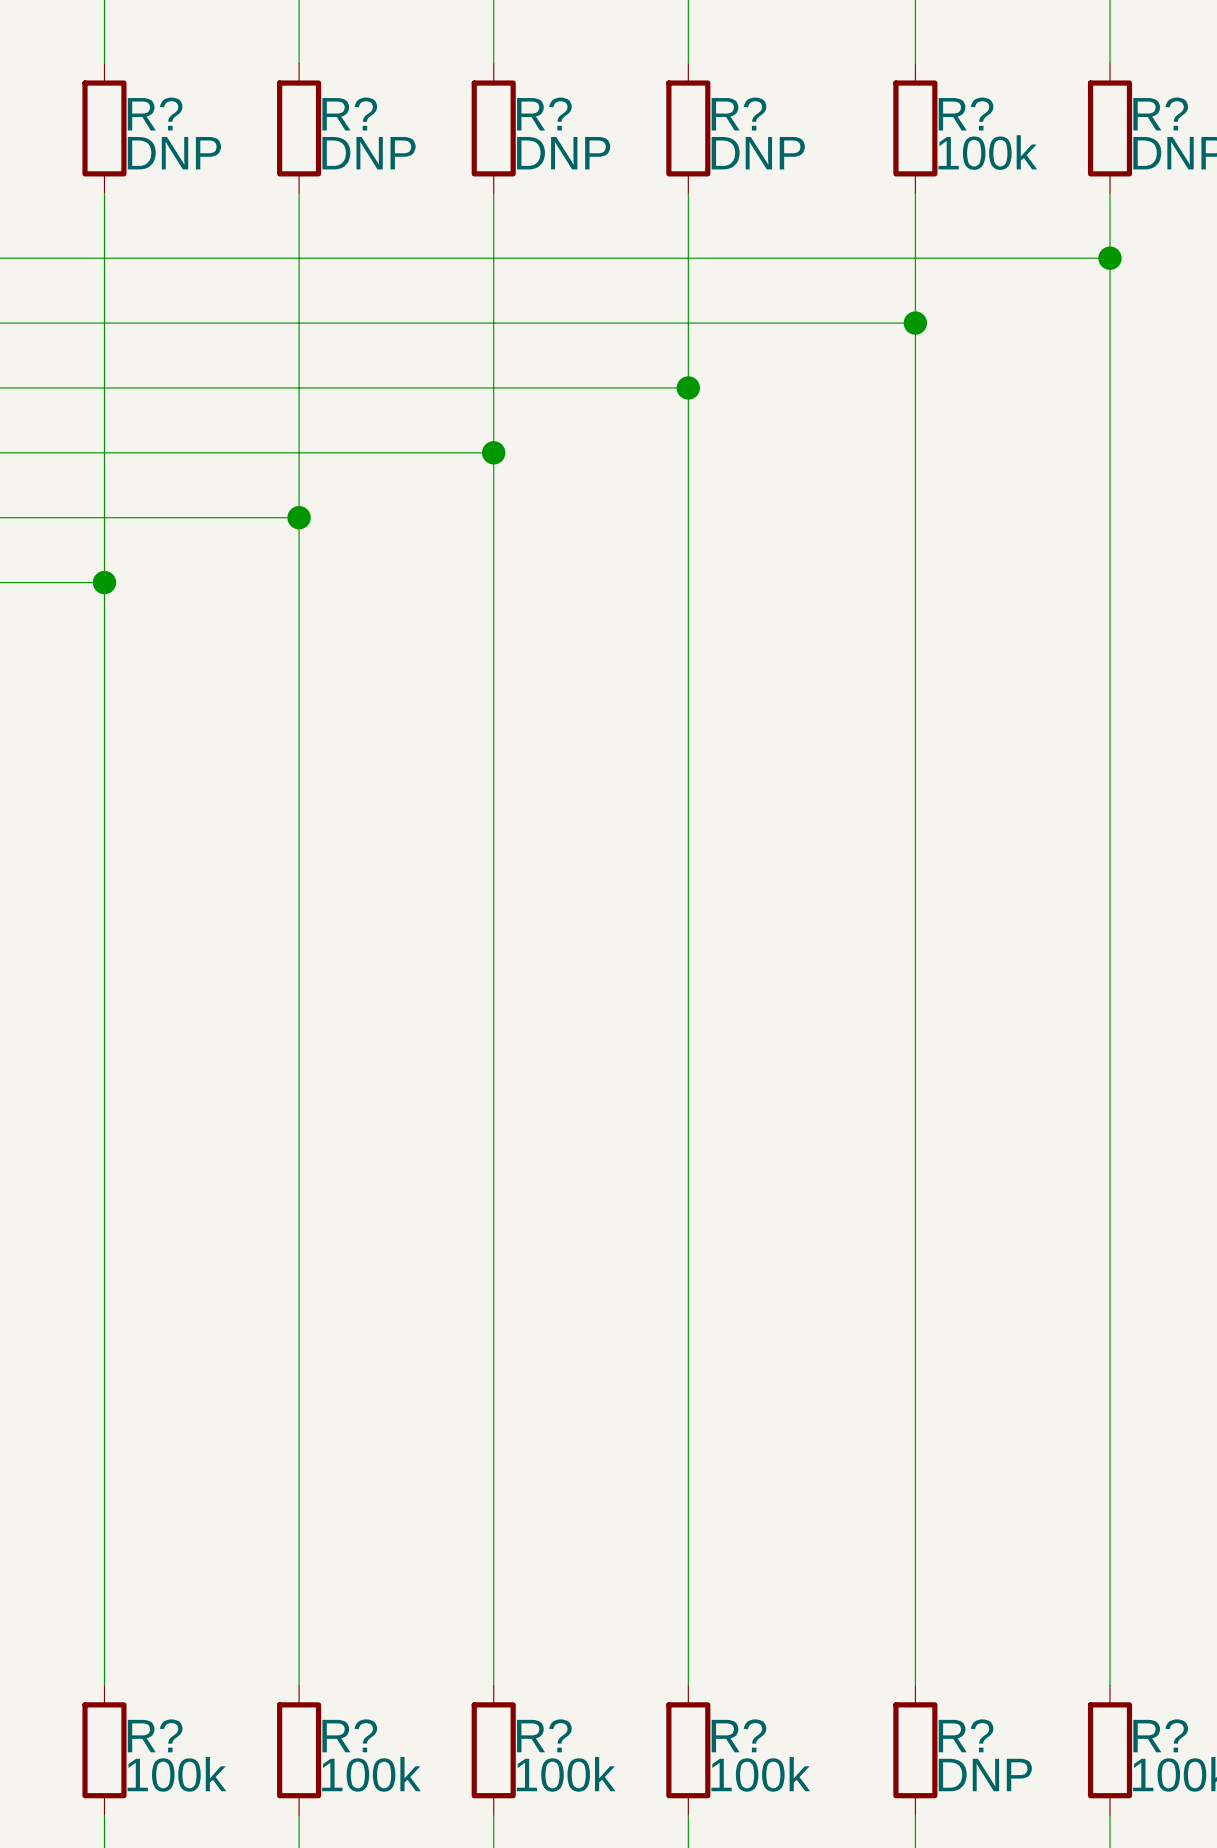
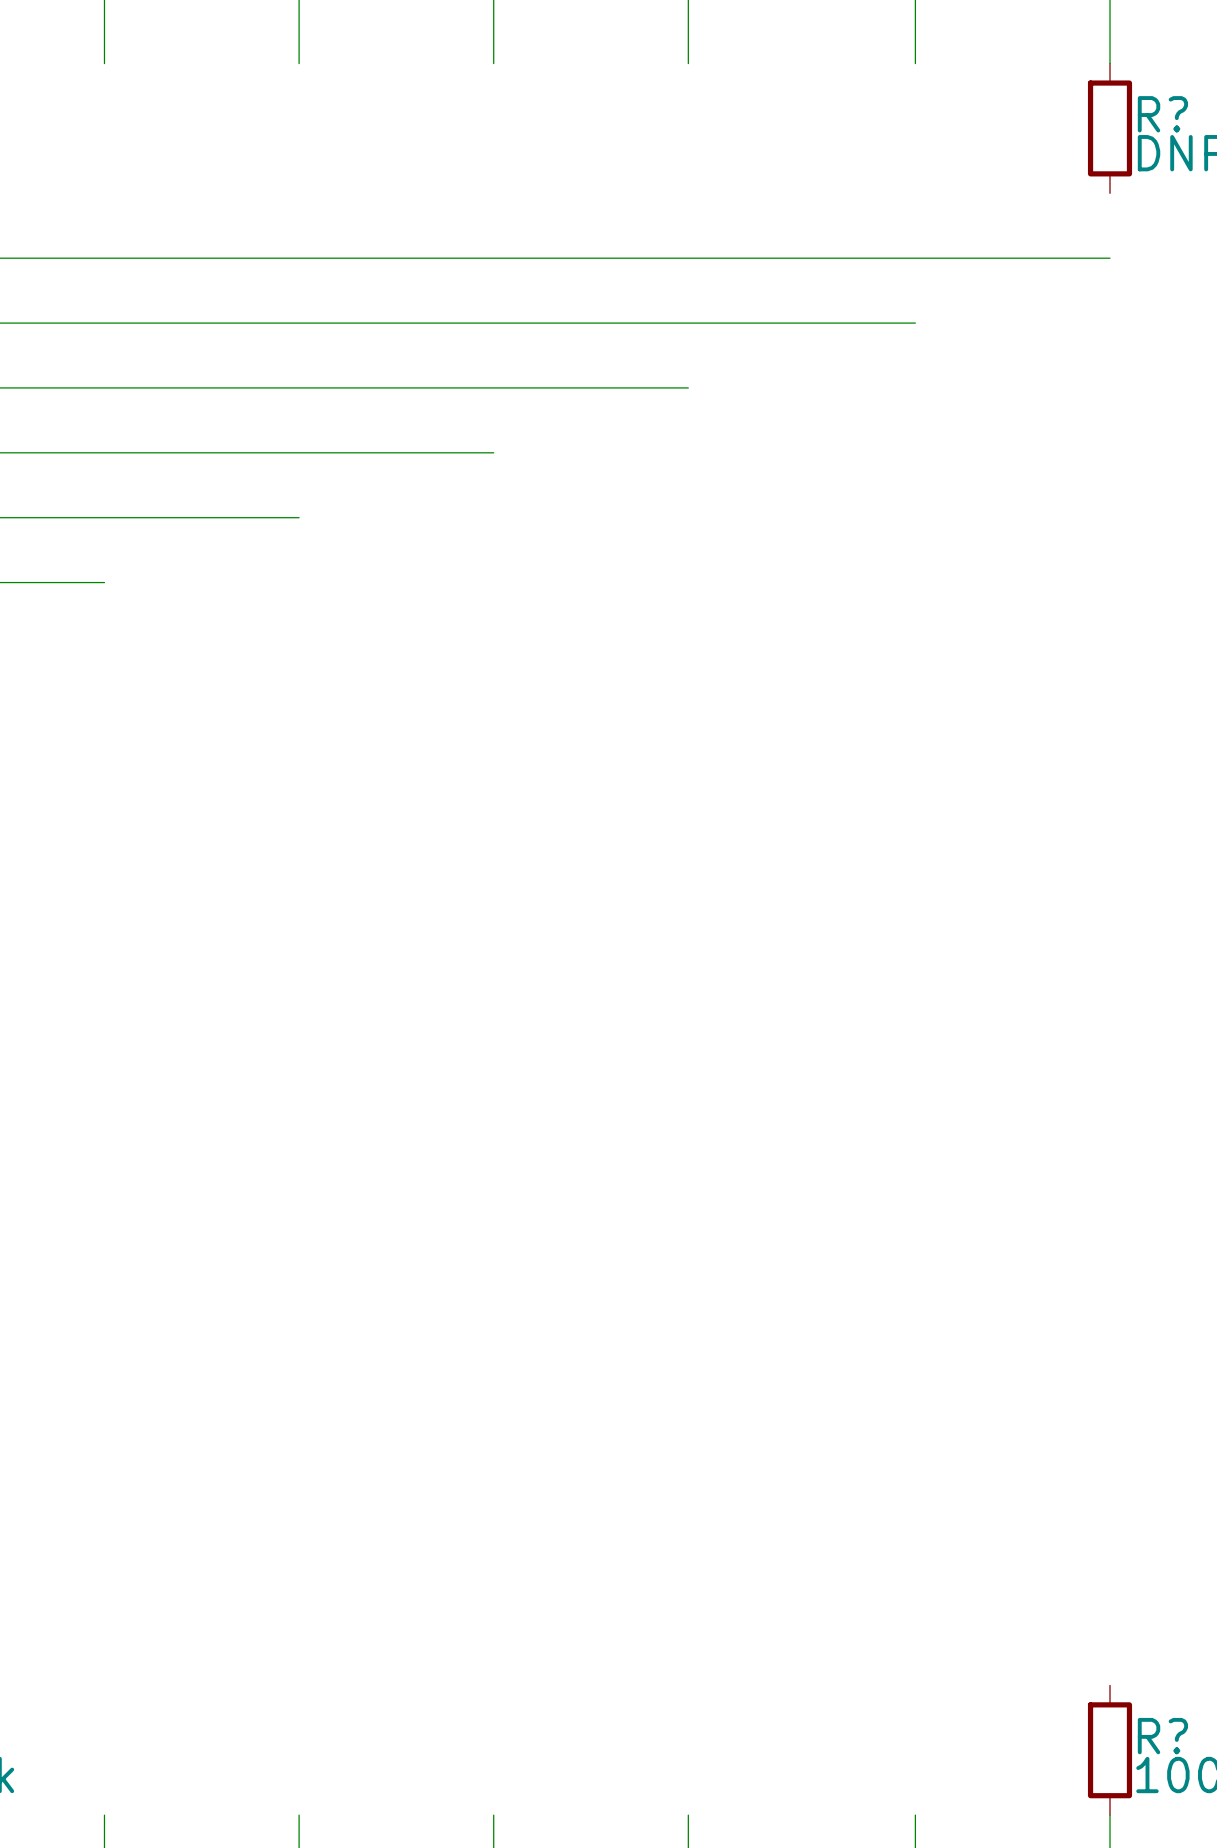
R?: DNP (104, 128) -> none
R?: DNP (299, 128) -> none
R?: DNP (493, 128) -> none
R?: DNP (688, 128) -> none
R?: 100k (915, 128) -> none
wire: (104, 193) (104, 1685) -> none
wire: (299, 193) (299, 1685) -> none
wire: (493, 193) (493, 1685) -> none
wire: (688, 193) (688, 1685) -> none
wire: (915, 193) (915, 1685) -> none
wire: (1110, 193) (1110, 1685) -> none
junction: (1110, 258) -> none
junction: (915, 323) -> none
junction: (688, 387) -> none
junction: (493, 452) -> none
junction: (299, 517) -> none
junction: (104, 582) -> none
R?: 100k (104, 1750) -> none
R?: 100k (299, 1750) -> none
R?: 100k (493, 1750) -> none
R?: 100k (688, 1750) -> none
R?: DNP (915, 1750) -> none

